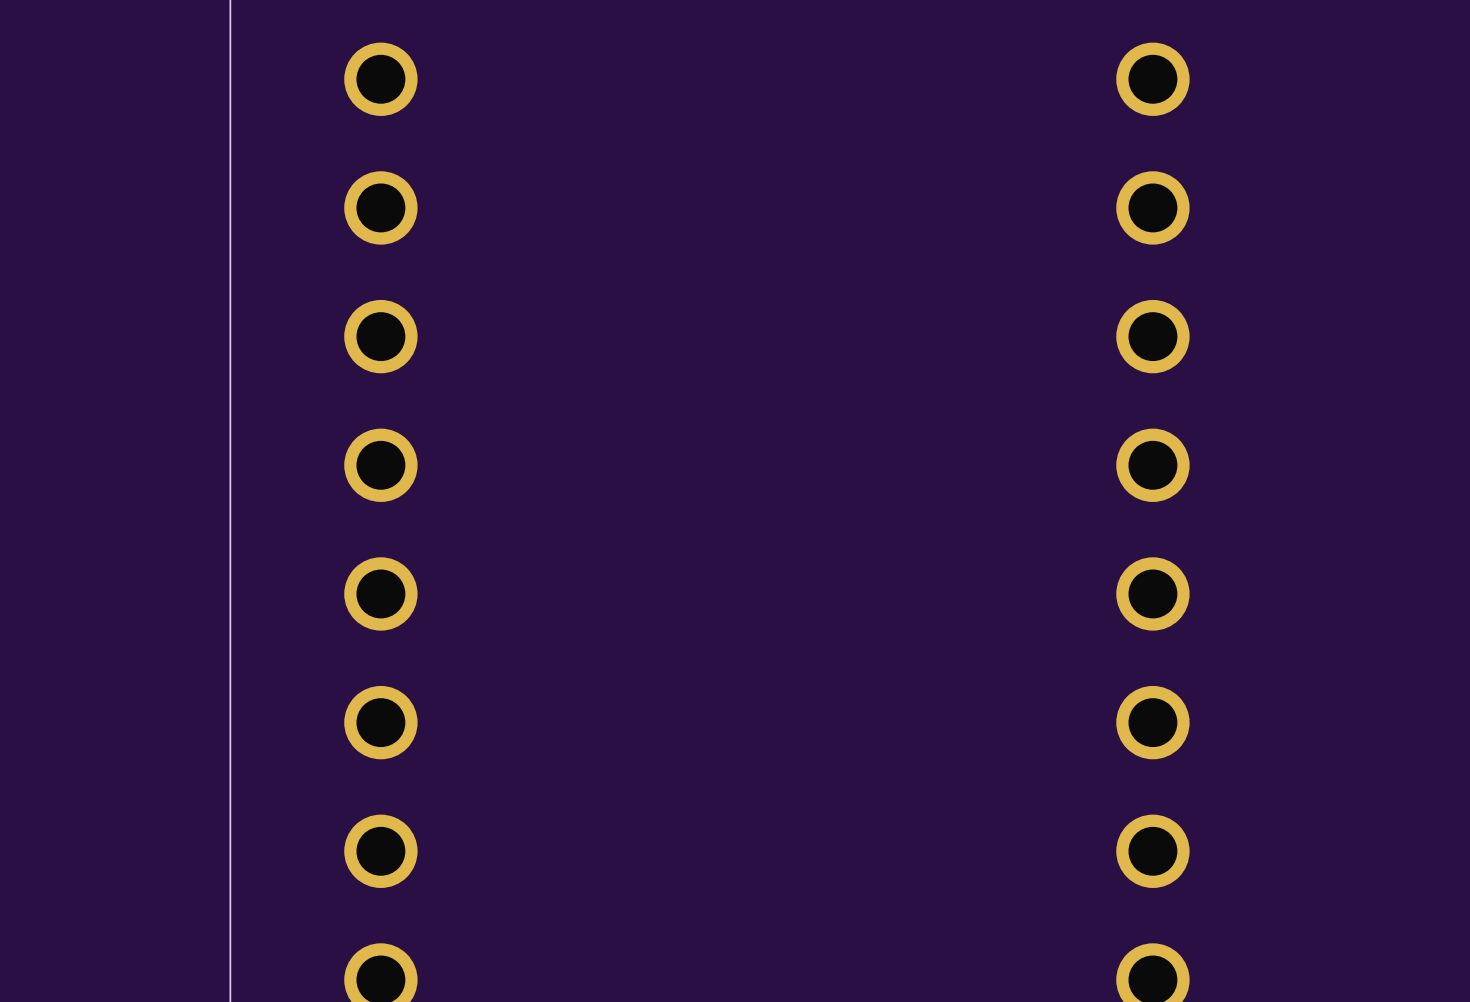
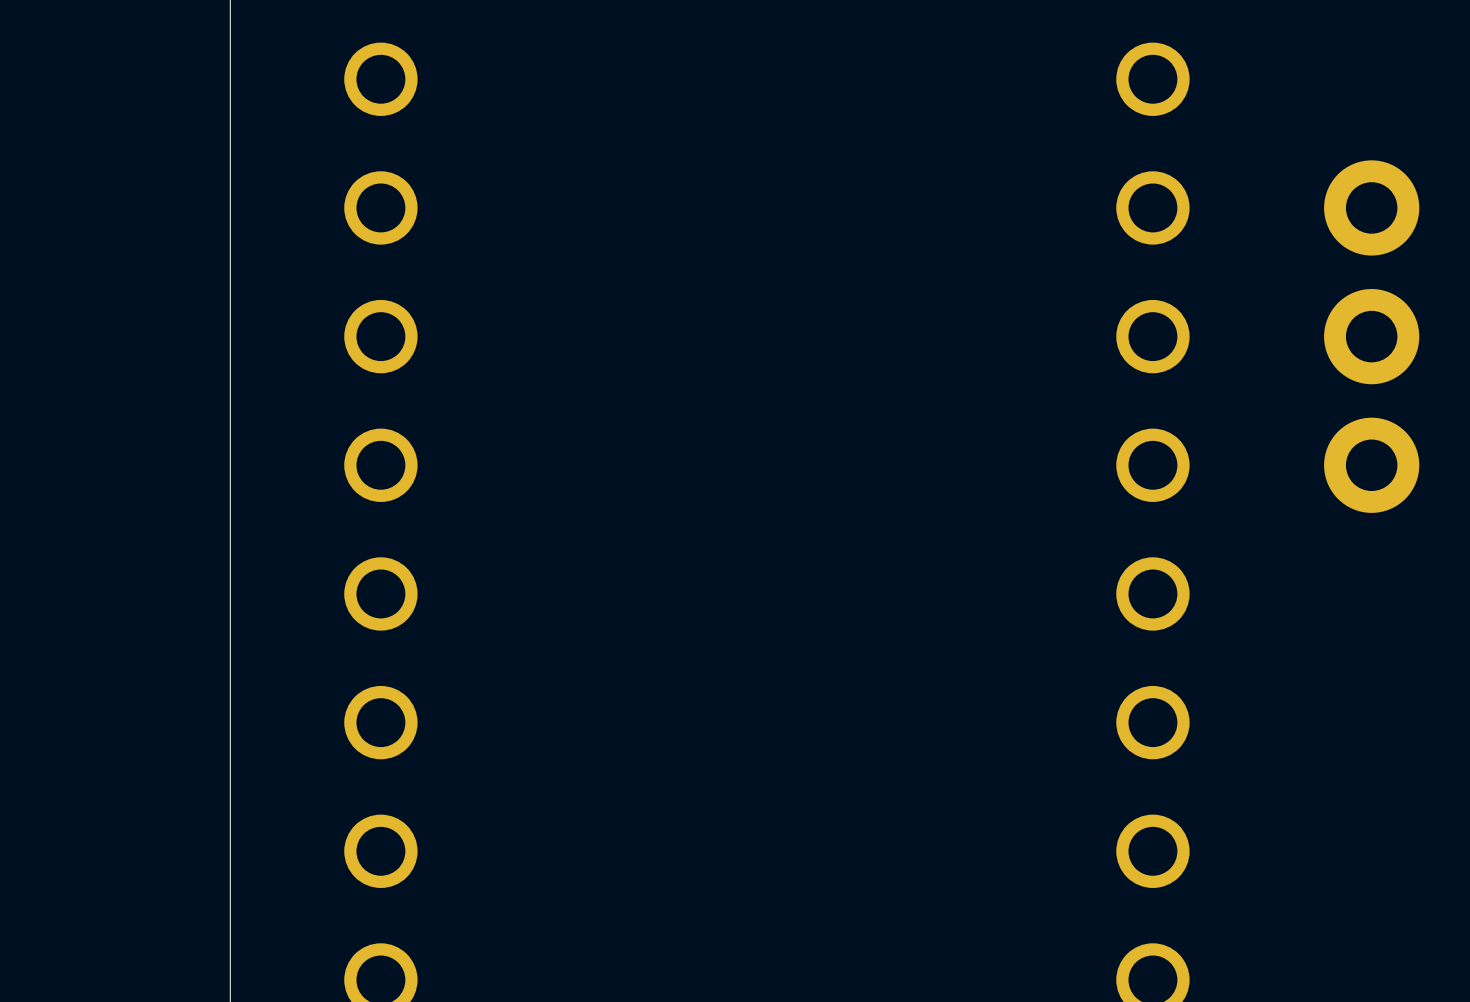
part: none -> (1371, 336)

